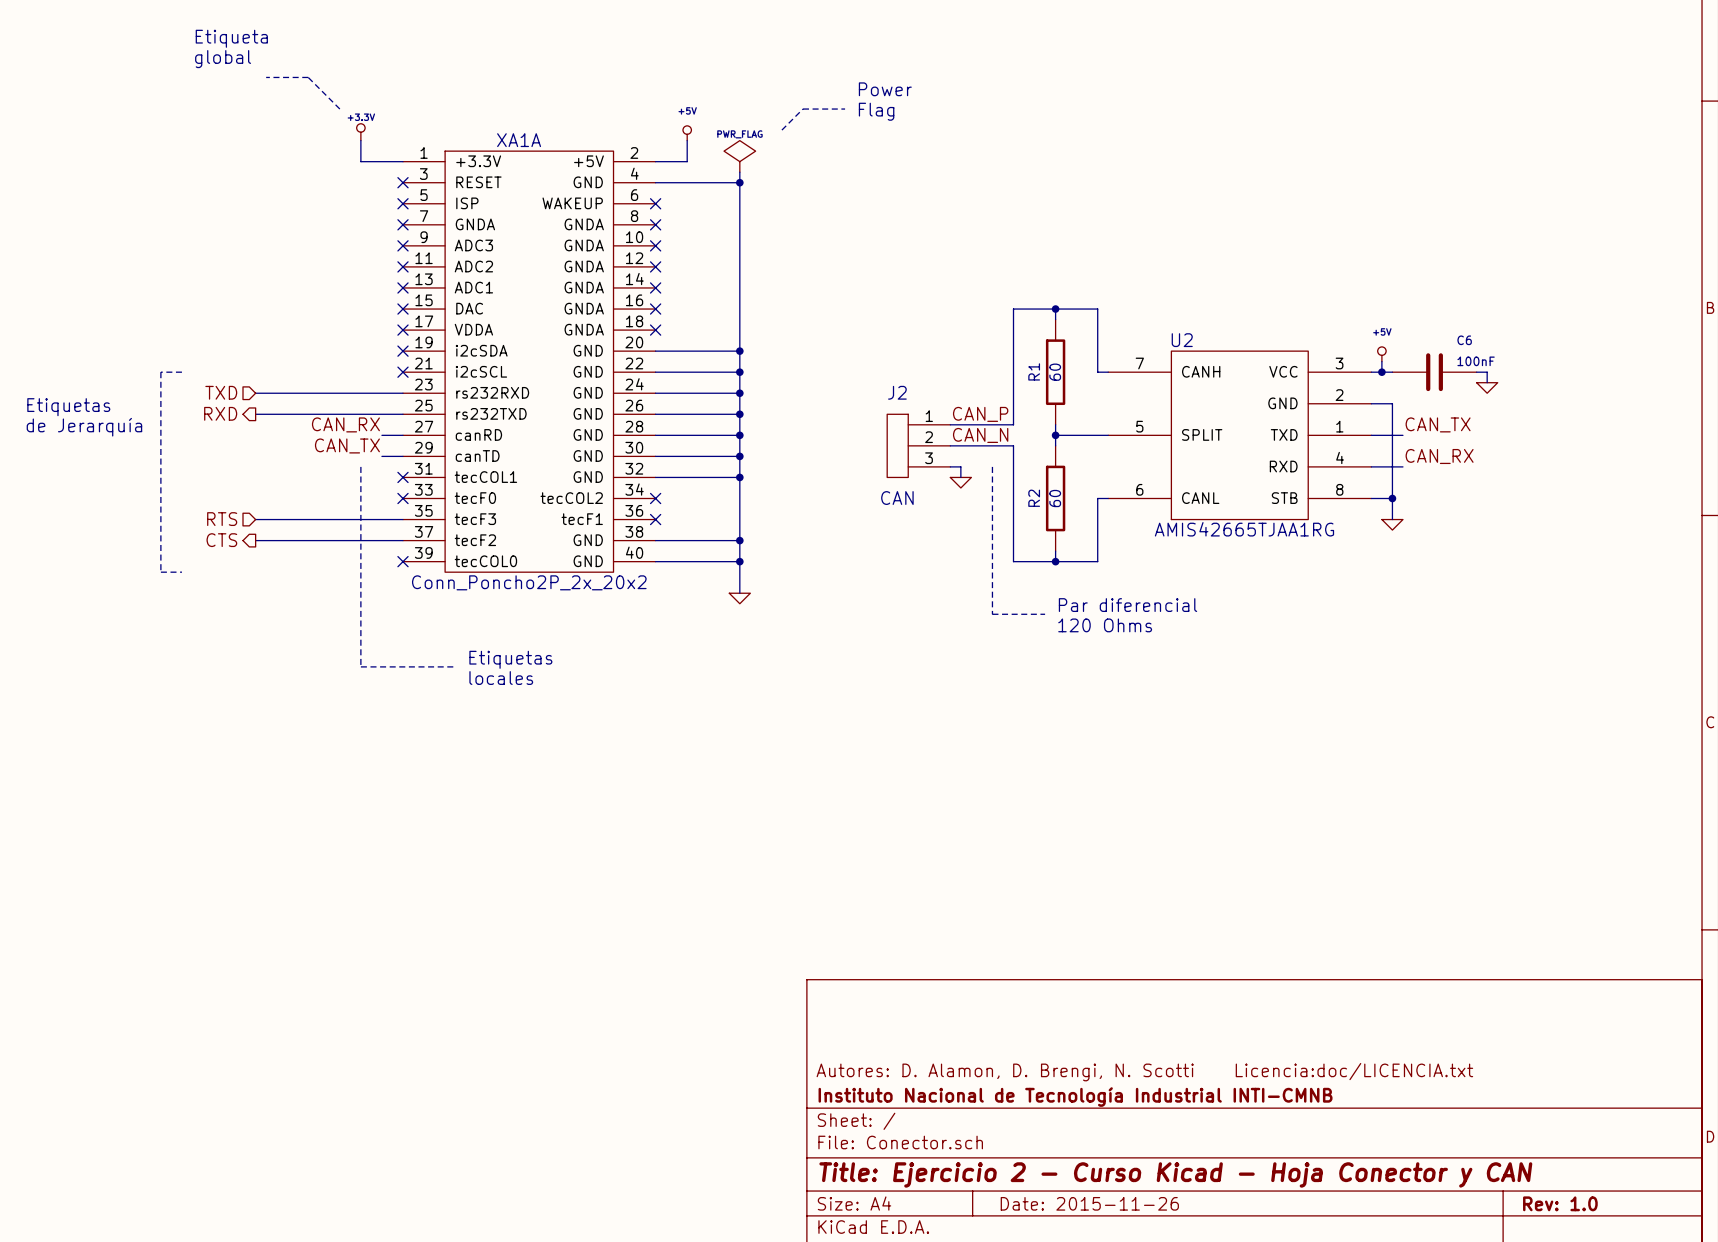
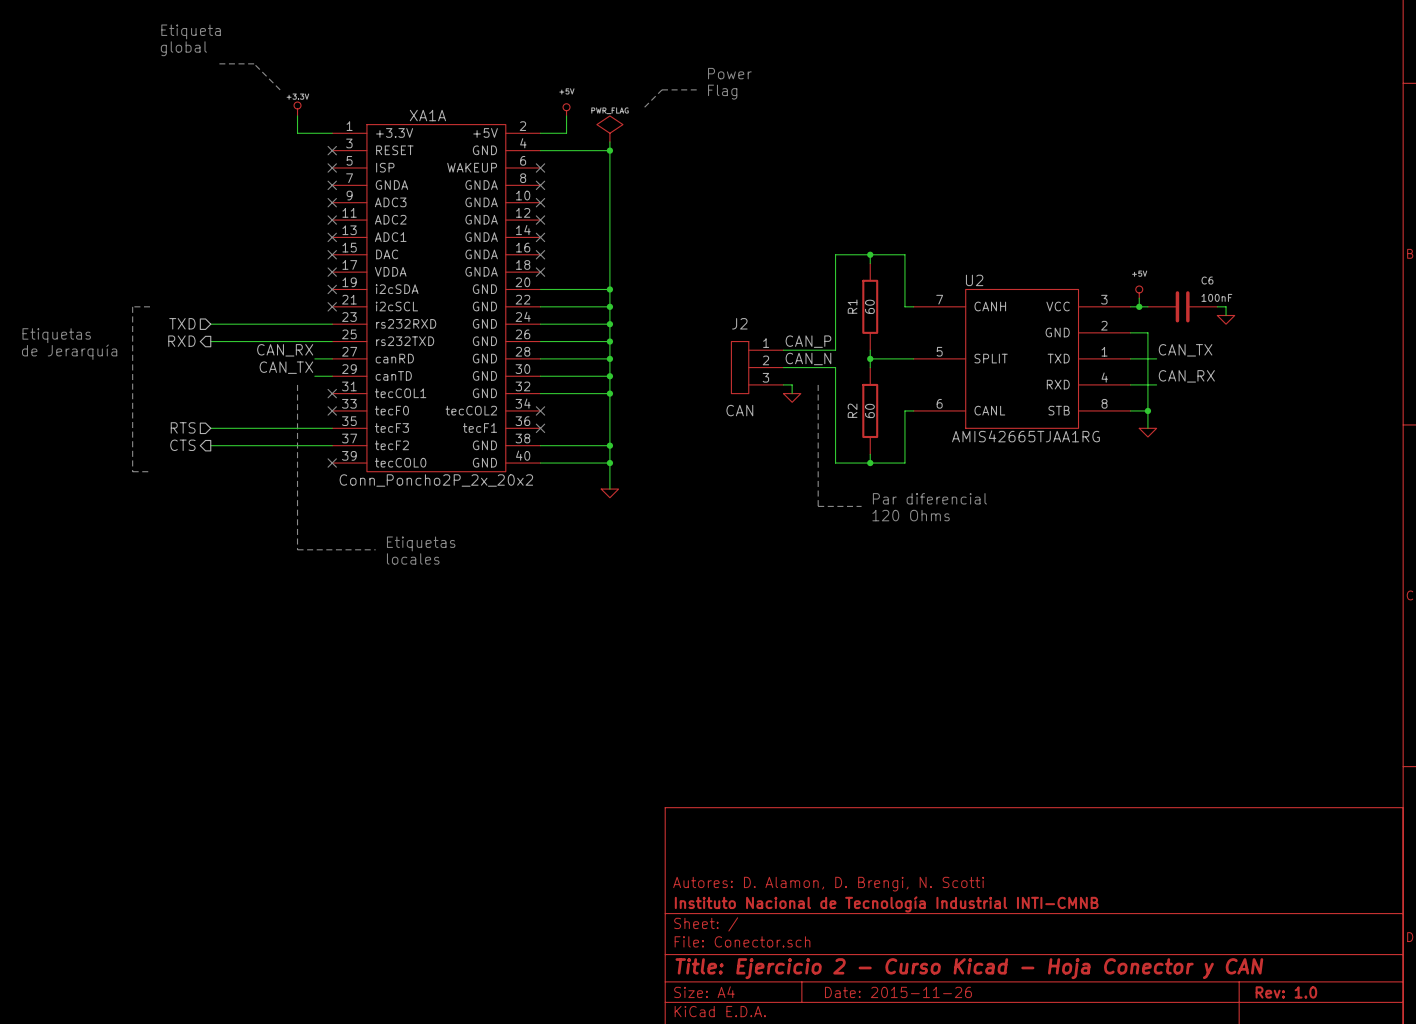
title block: Autores: D. Alamon, D. Brengi, N. Scotti Licencia:doc/LICENCIA.txt (1144, 1072) -> Autores: D. Alamon, D. Brengi, N. Scotti (828, 884)

